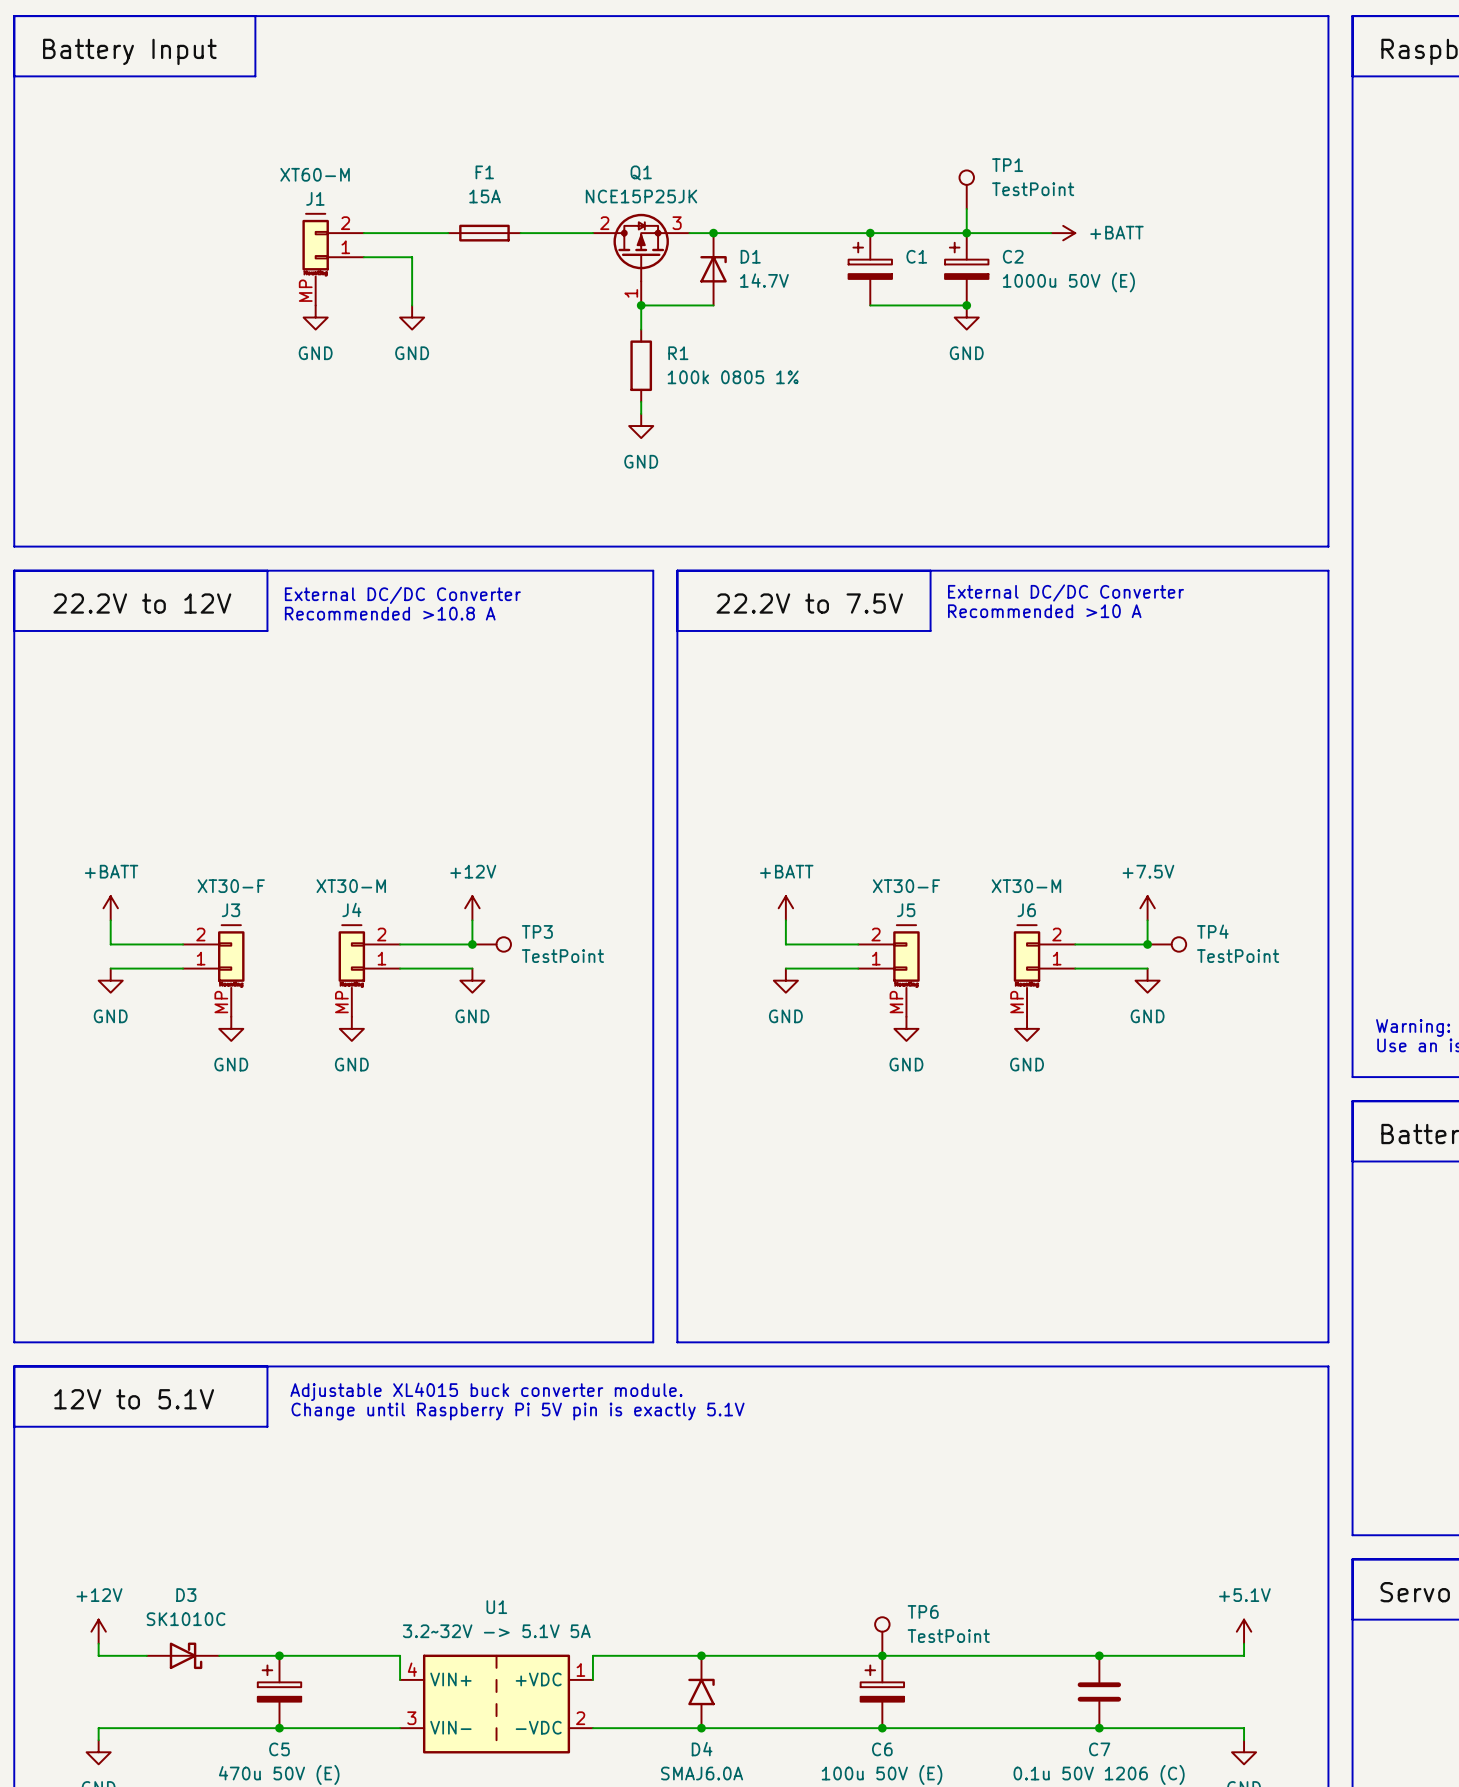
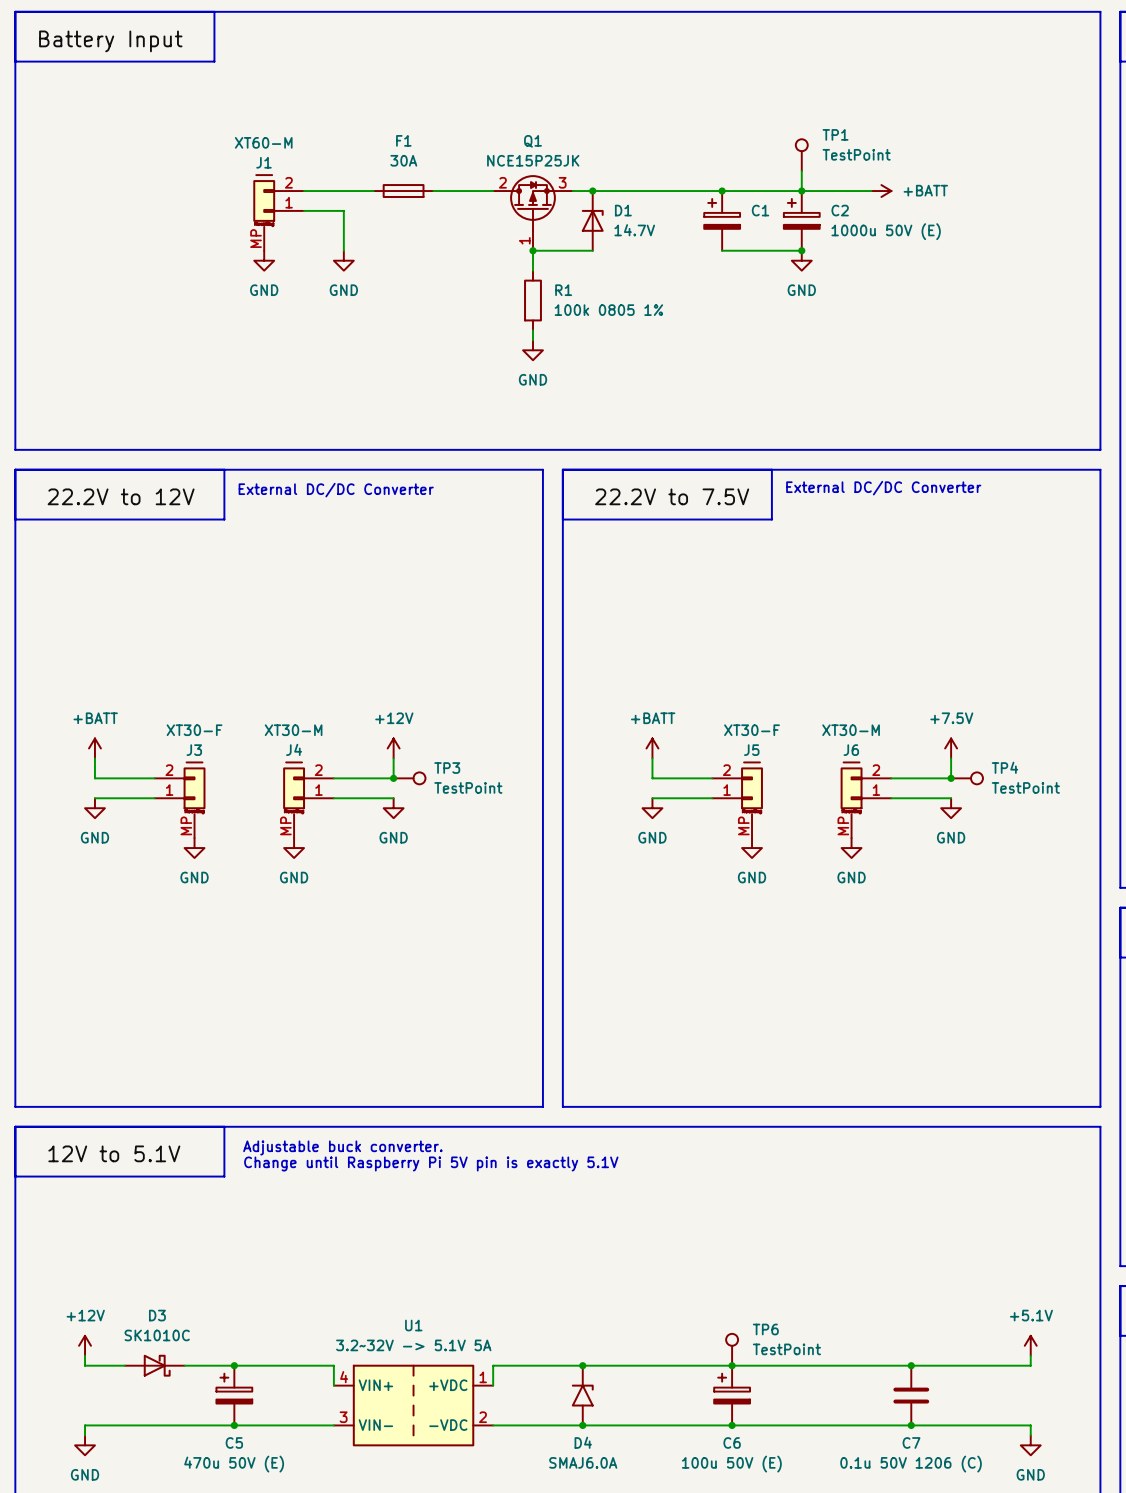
F1 value: 15A (485, 196) -> 30A (403, 160)
text: Recommended >10 A (1044, 611) -> none
text: Recommended >10.8 A (390, 613) -> none
text: Adjustable XL4015 buck converter module. (486, 1391) -> Adjustable buck converter. (342, 1147)

